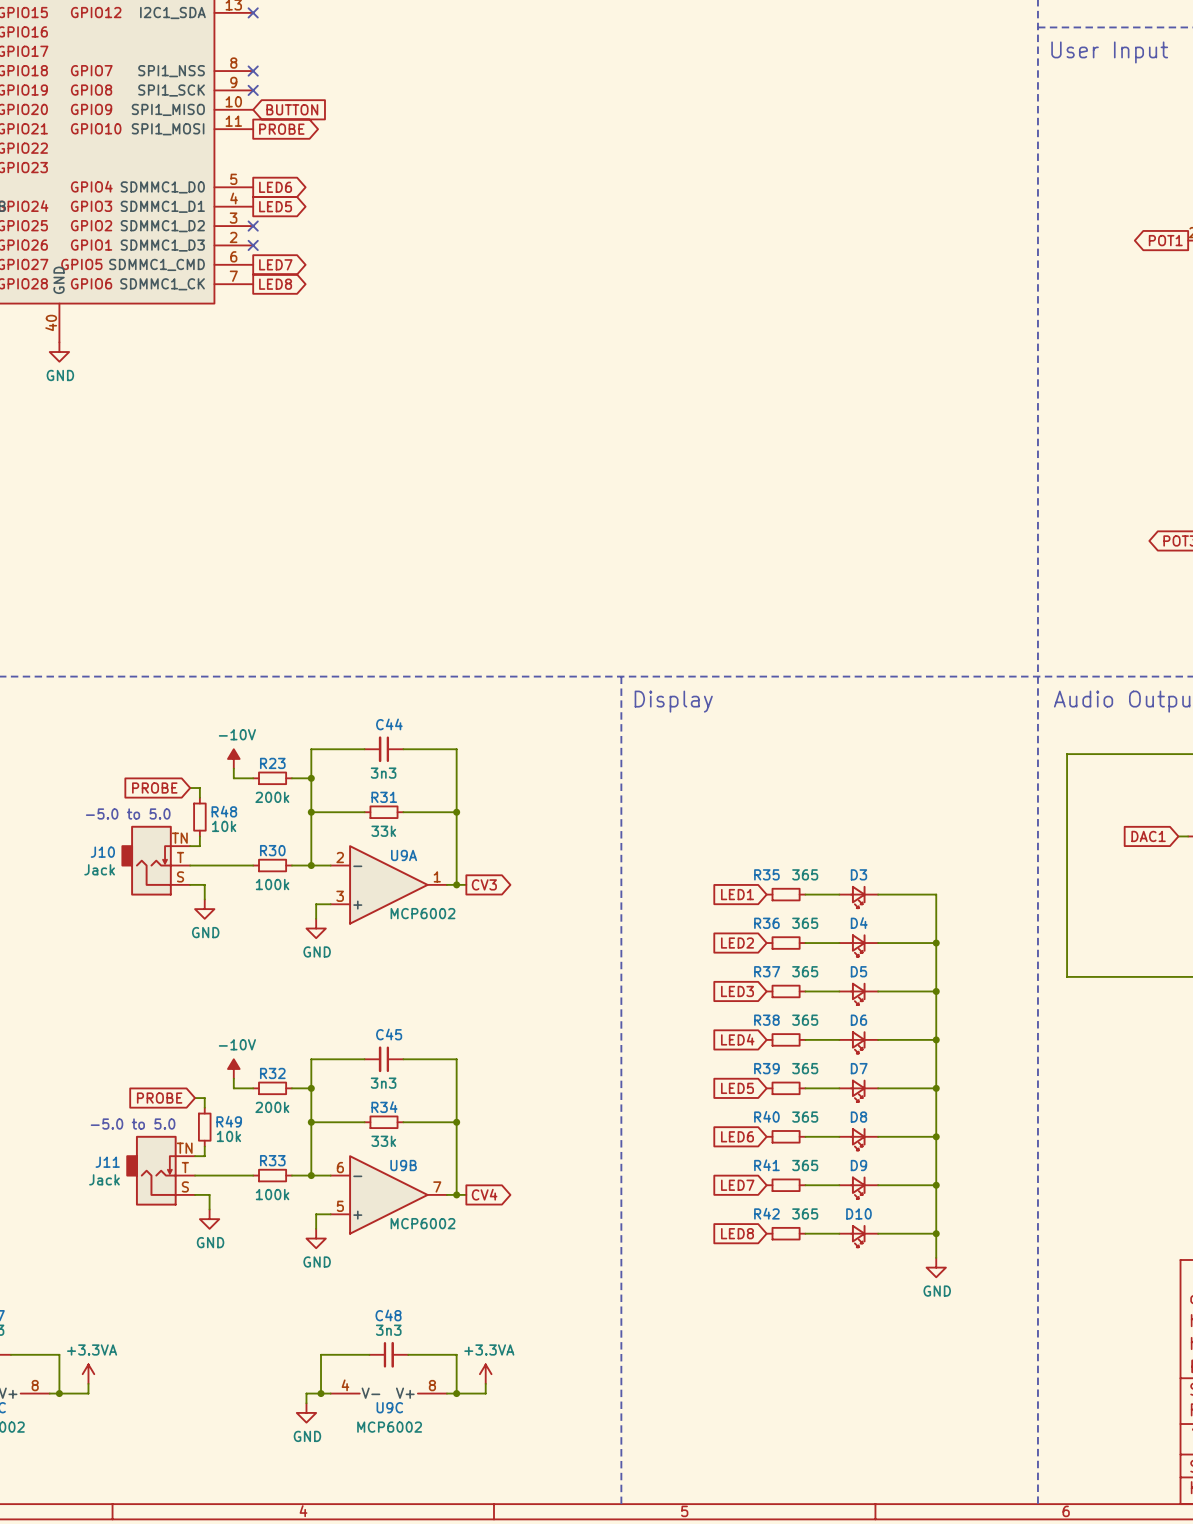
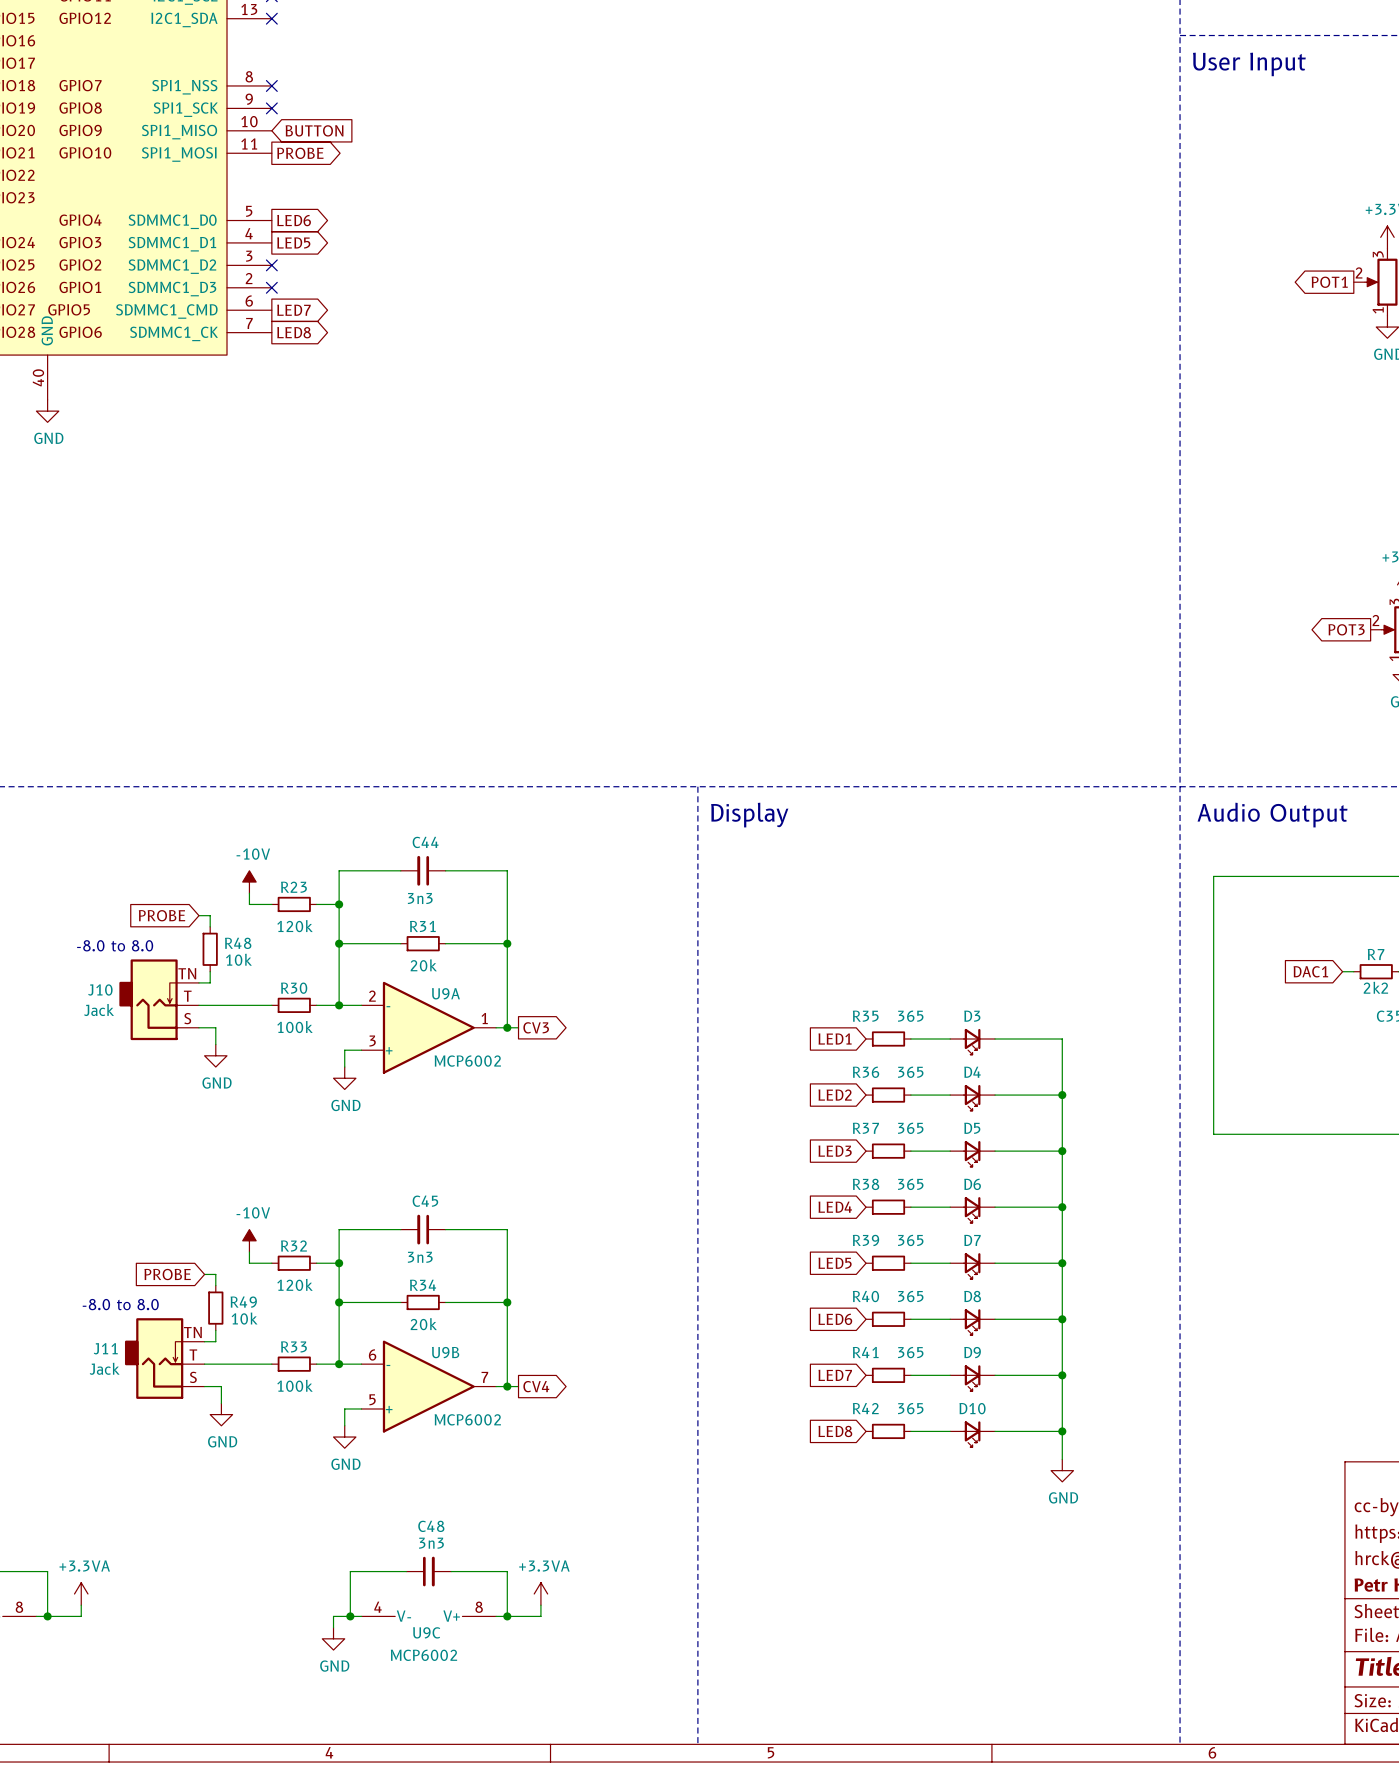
R23 value: 200k (272, 797) -> 120k (295, 926)
text: -5.0 to 5.0 (128, 813) -> -8.0 to 8.0 (115, 945)
R31 value: 33k (383, 831) -> 20k (423, 965)
R32 value: 200k (272, 1107) -> 120k (295, 1284)
text: -5.0 to 5.0 (133, 1124) -> -8.0 to 8.0 (120, 1304)
R34 value: 33k (383, 1141) -> 20k (423, 1324)

